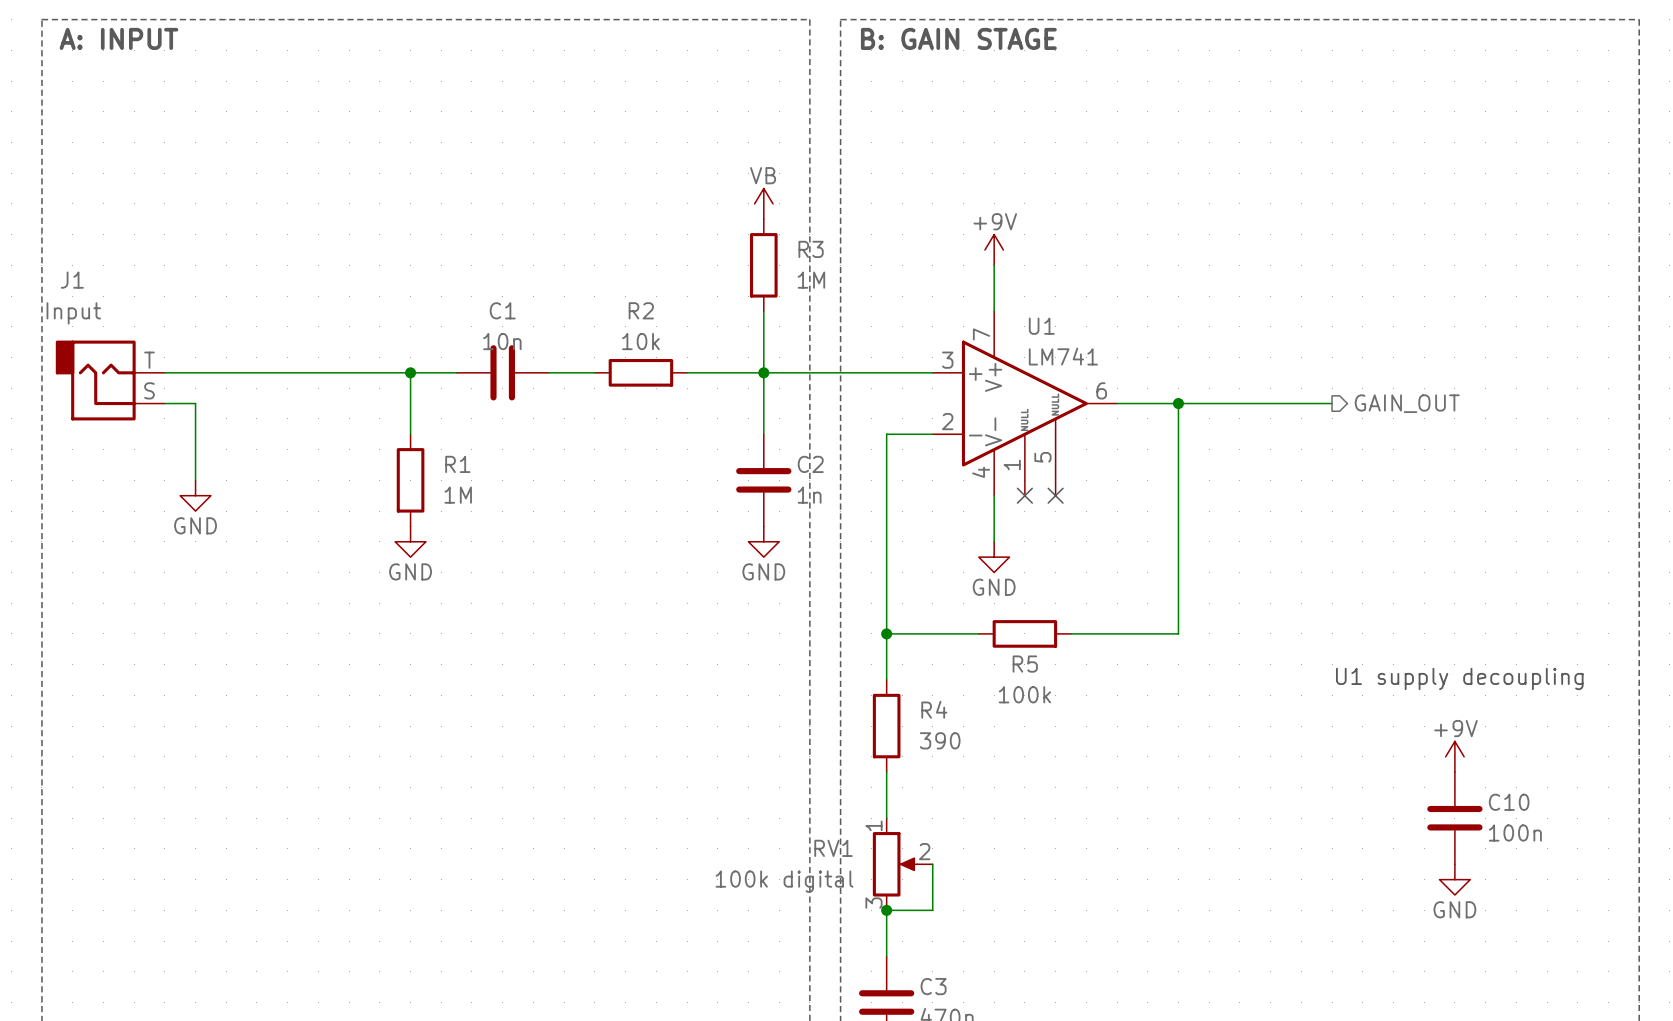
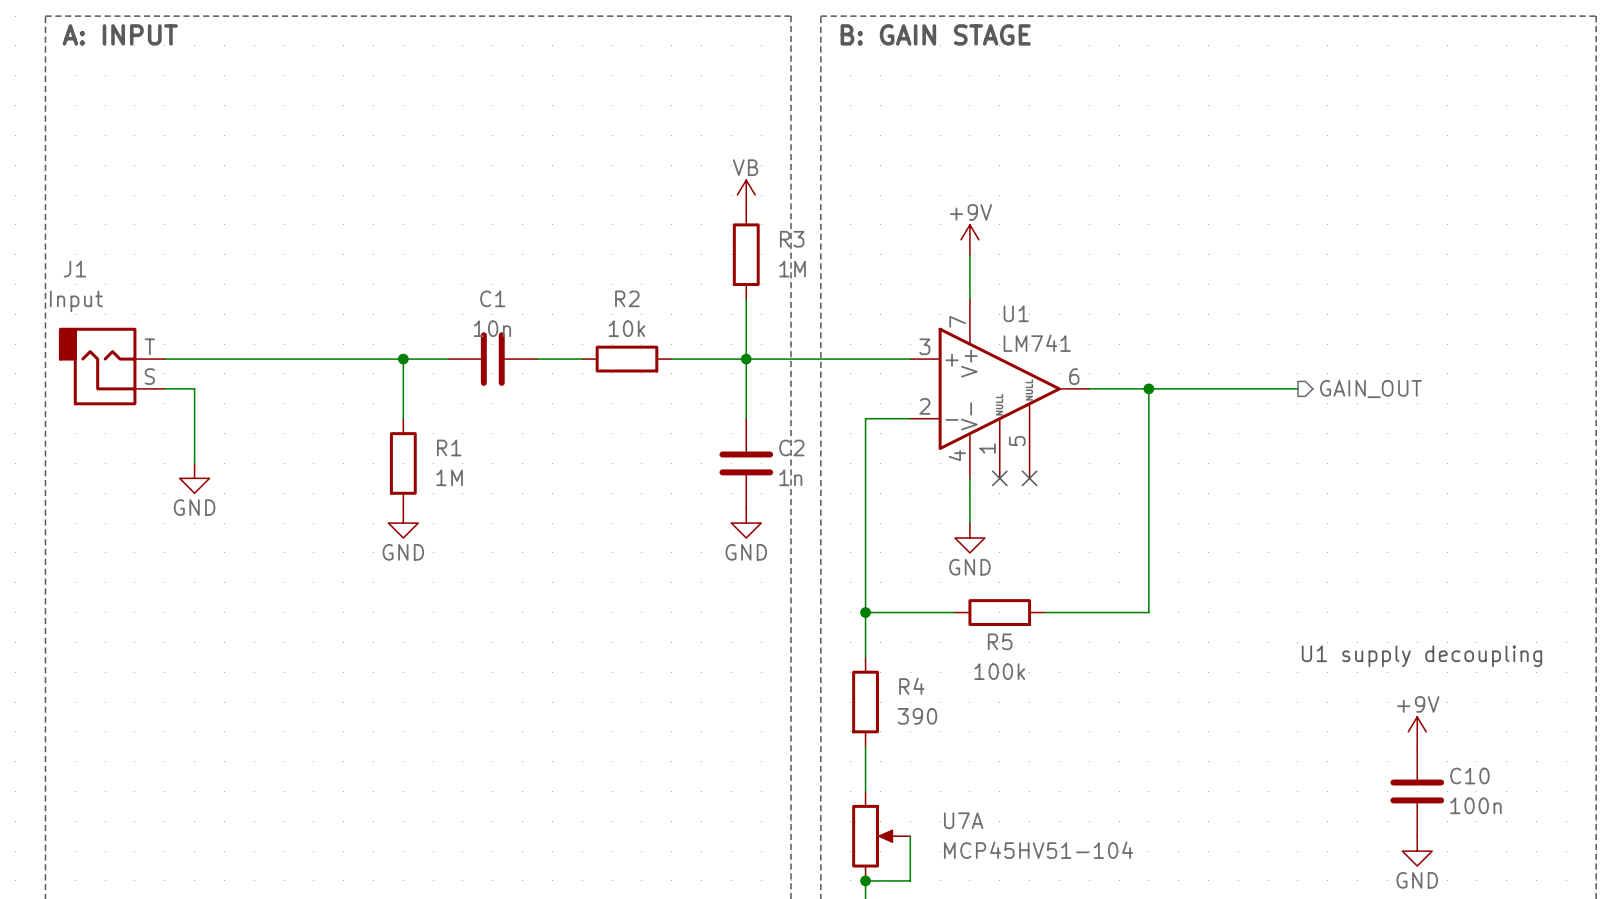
RV1 pin number: 1 (873, 825) -> none
RV1 name: RV1 (833, 848) -> U7A (963, 820)
RV1 pin number: 2 (924, 851) -> none
RV1 value: 100k digital (784, 881) -> MCP45HV51-104 (1038, 850)
RV1 pin number: 3 (873, 903) -> none

